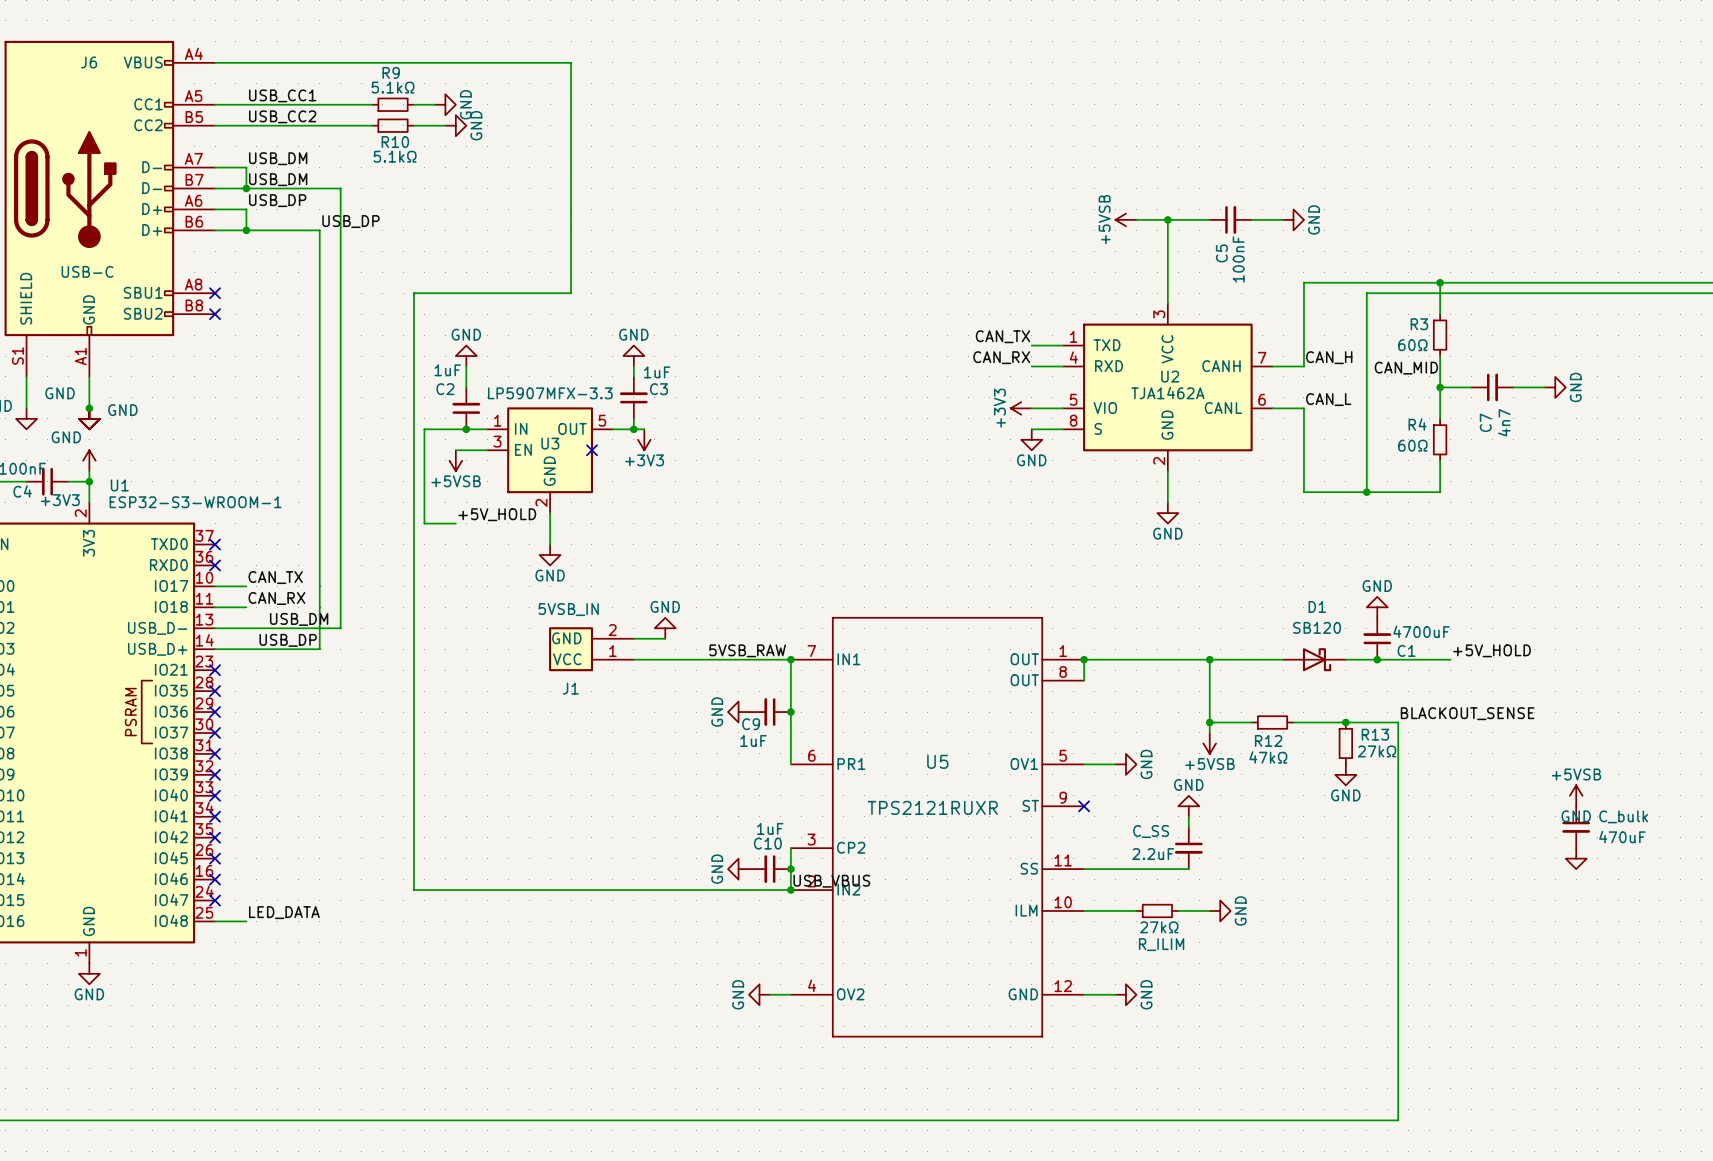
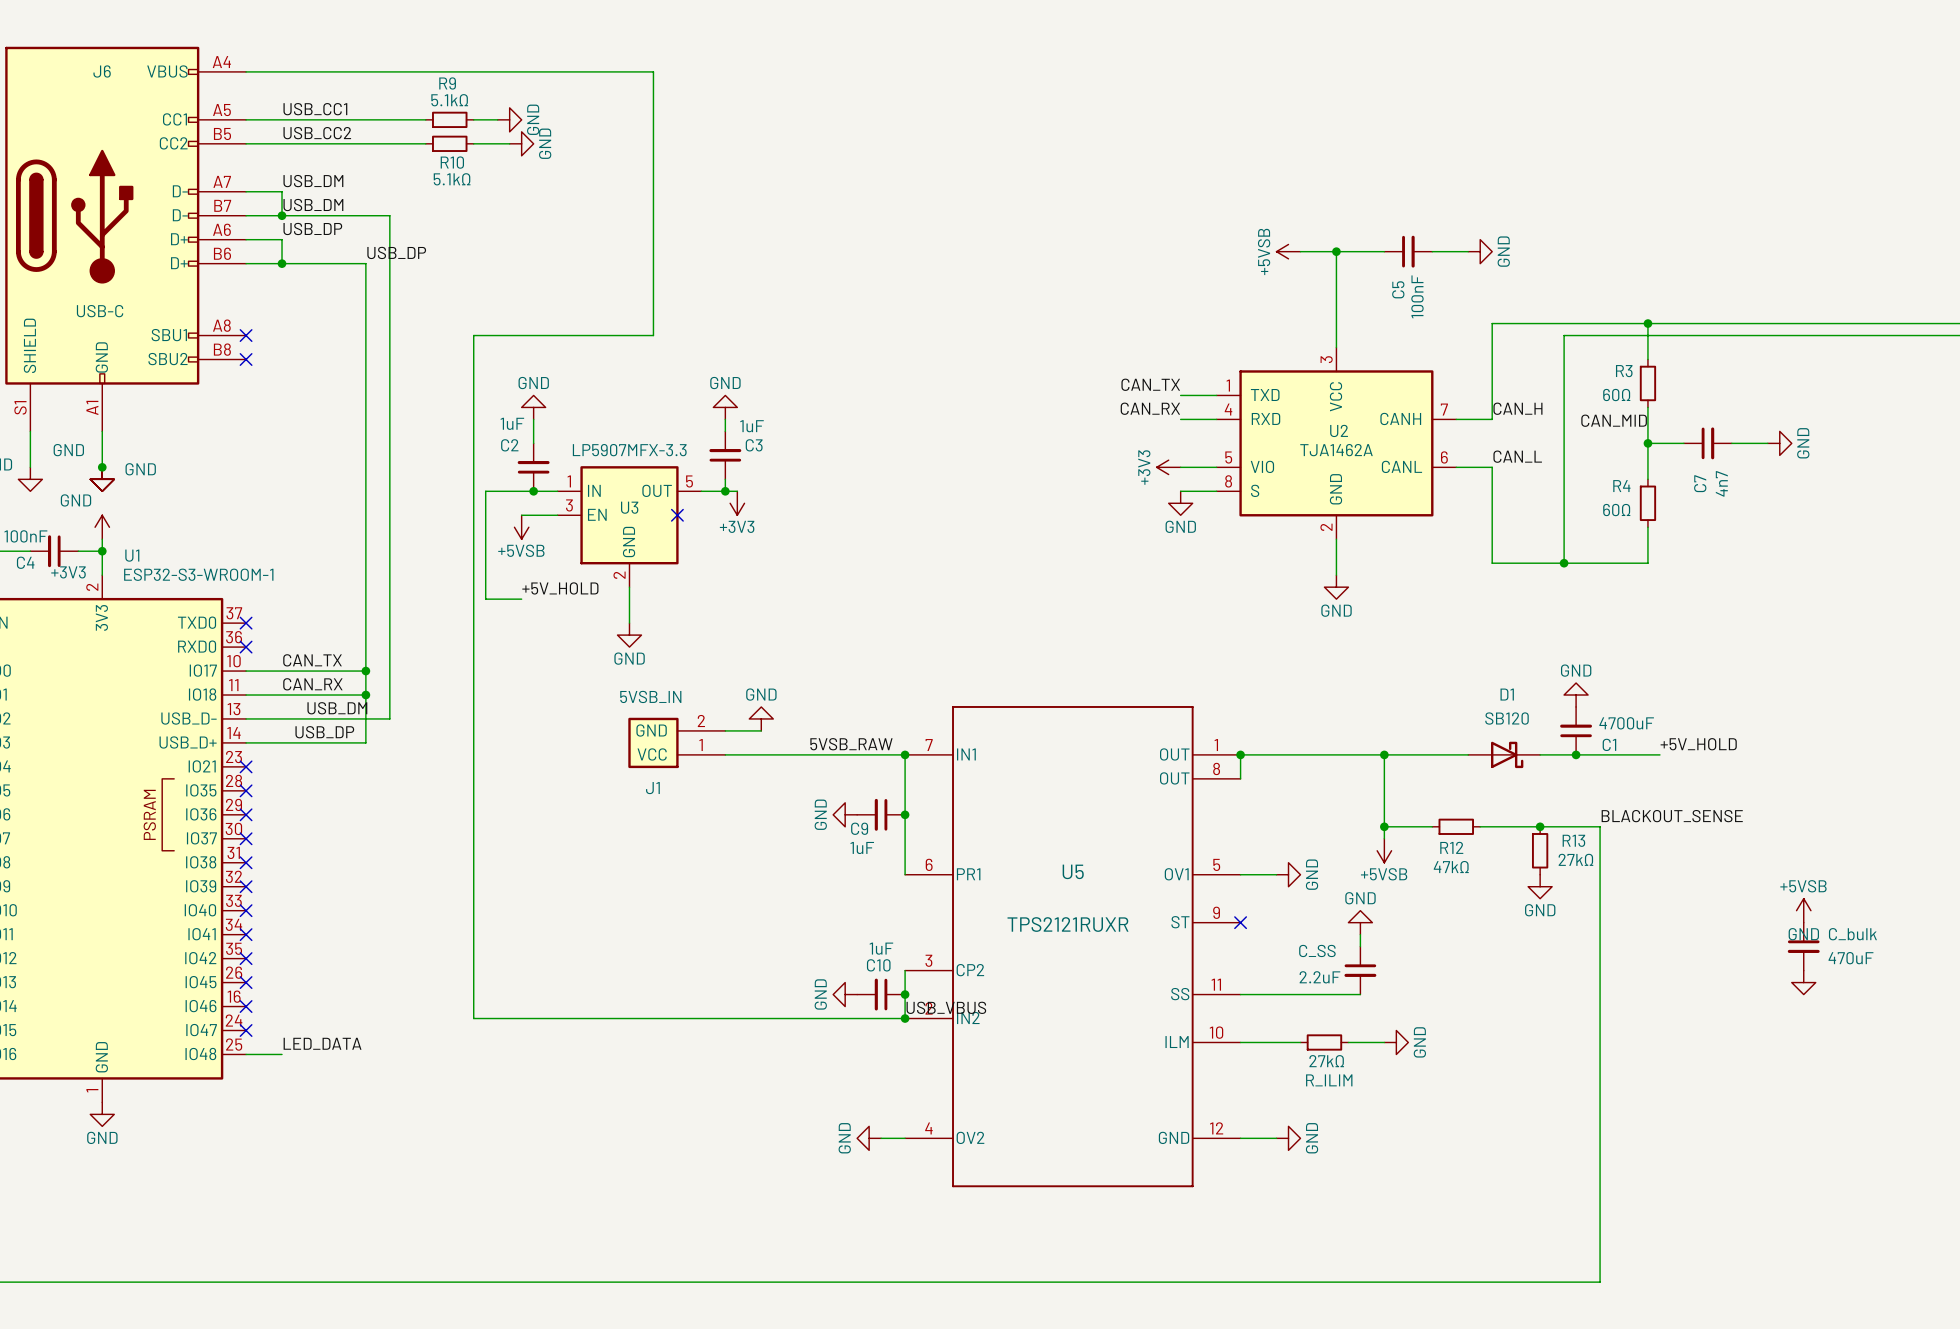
wire: none -> (282, 671) (365, 671)
junction: none -> (365, 671)
wire: none -> (282, 695) (365, 695)
junction: none -> (365, 695)

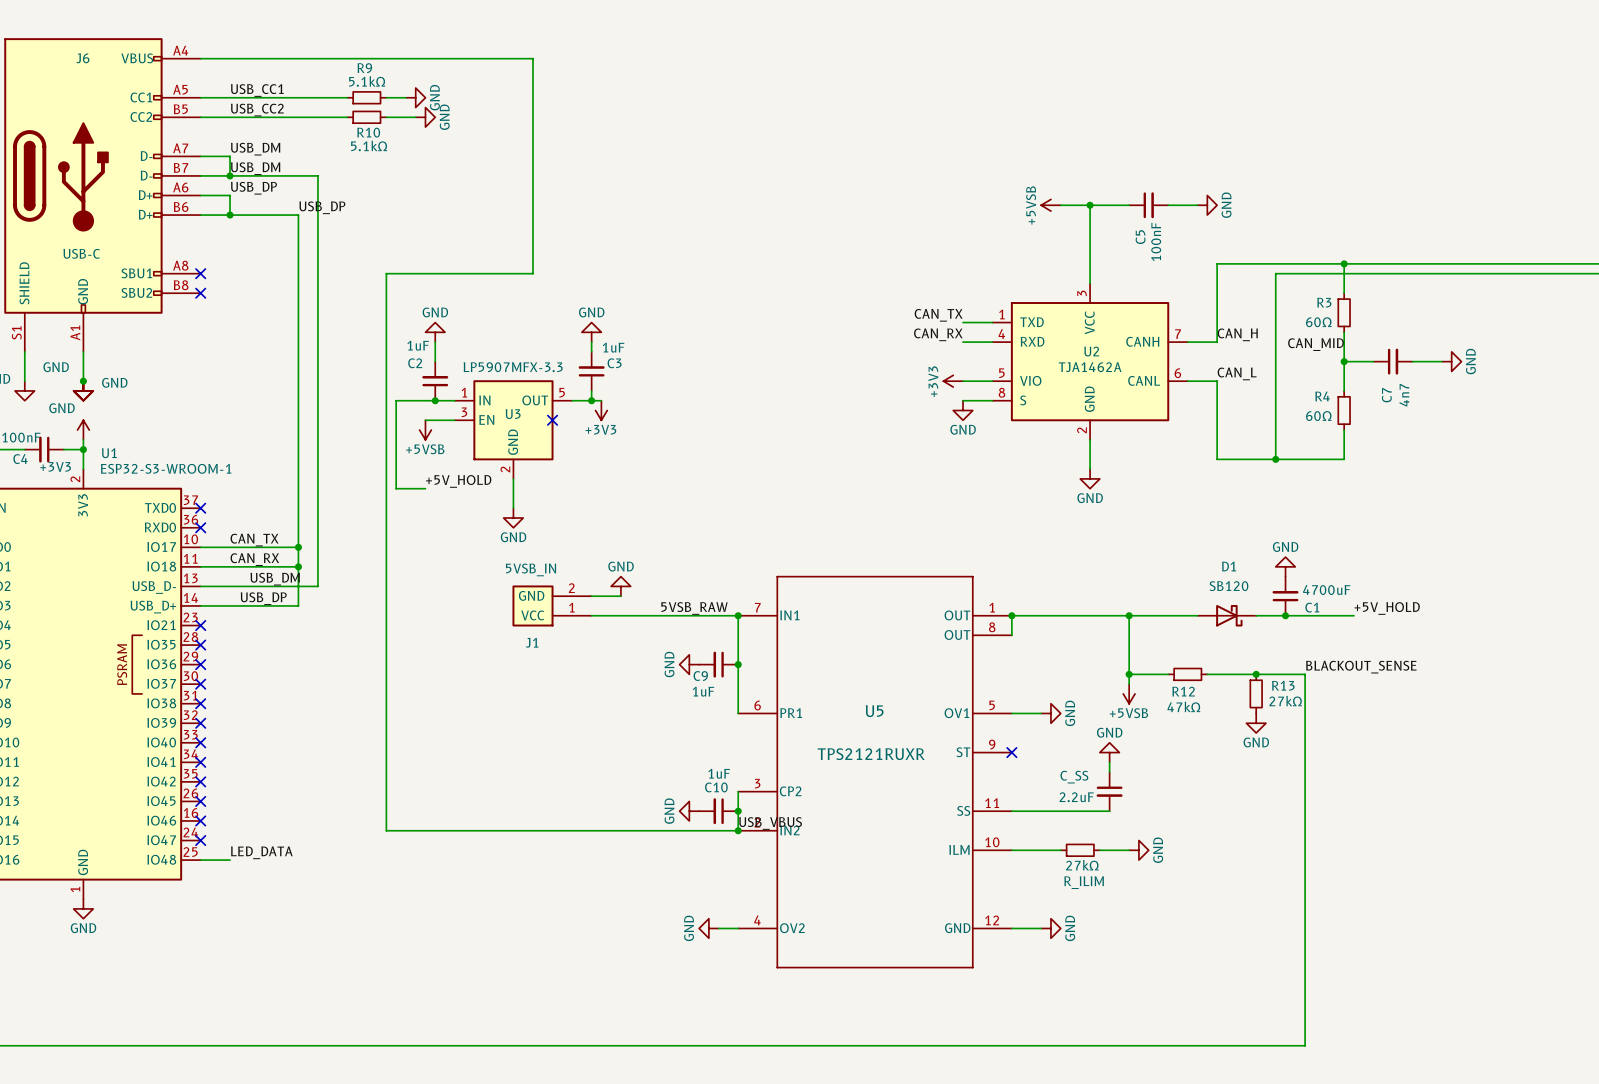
power symbol: +5VSB (1803, 910) -> none
C_bulk: 470uF (1803, 946) -> none
power symbol: GND (1803, 982) -> none

